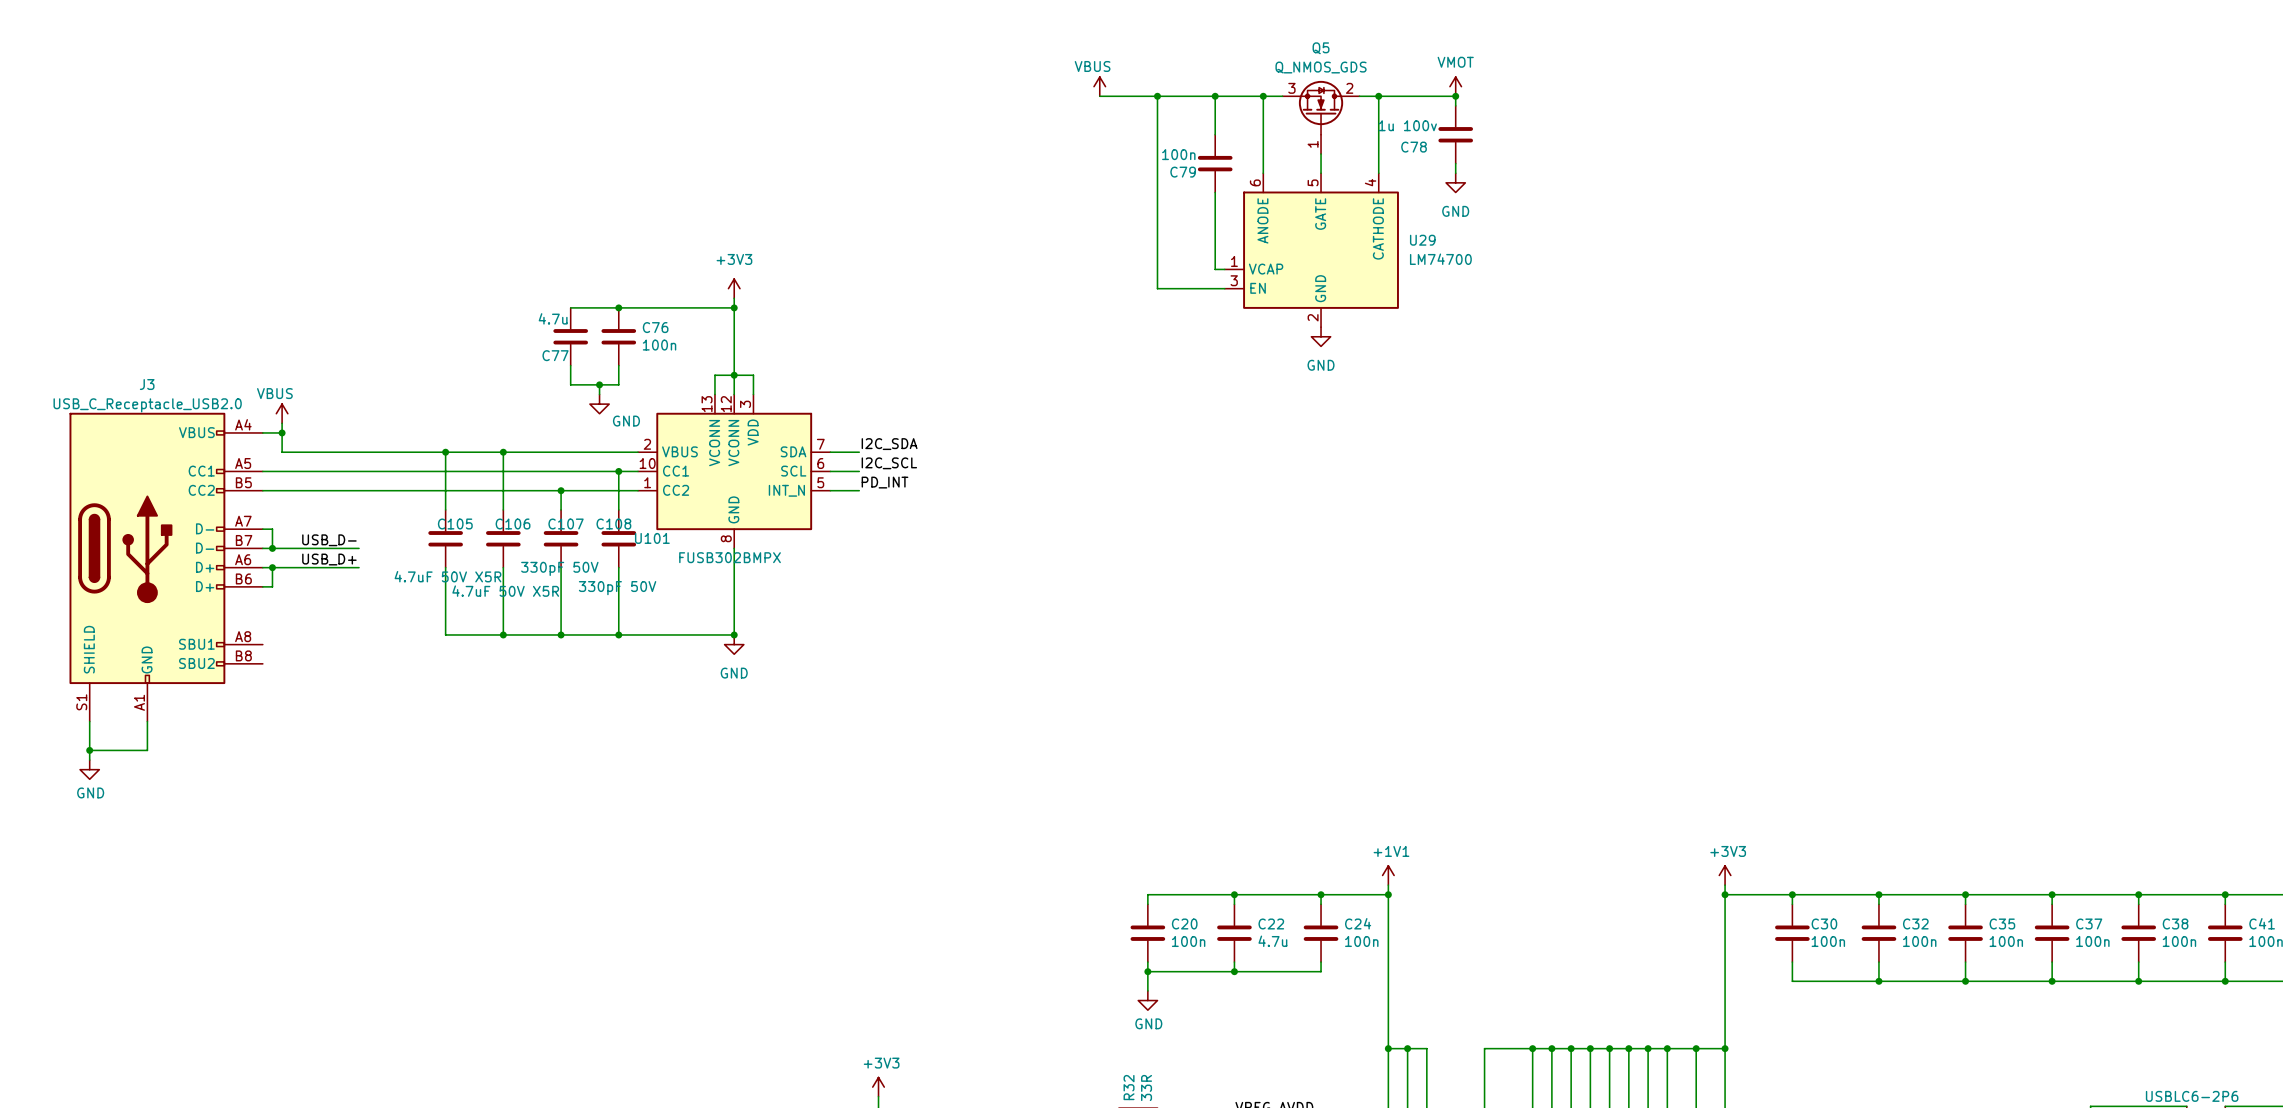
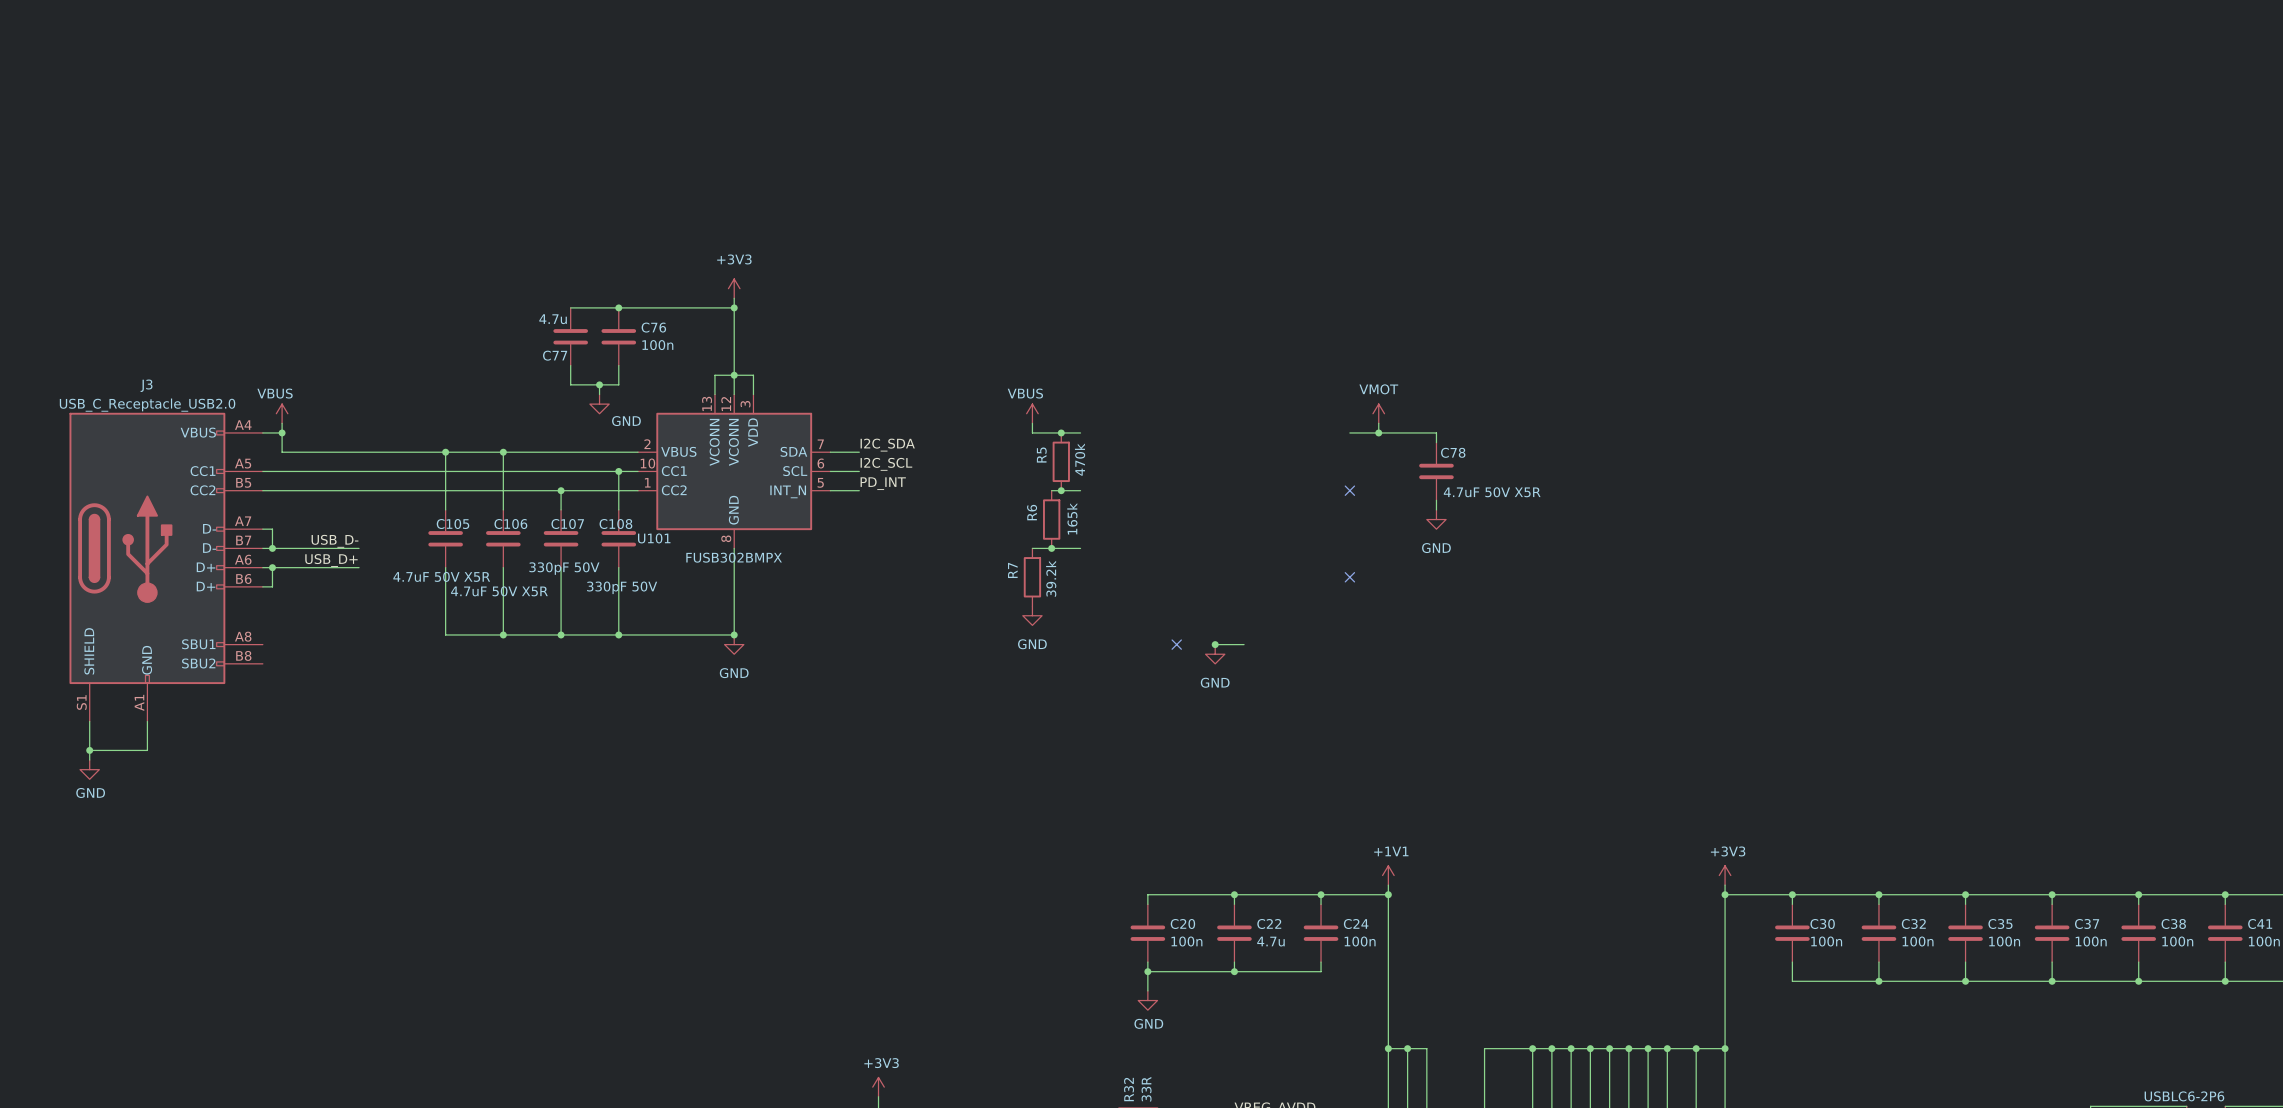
power symbol: VBUS (1099, 86) -> none
power symbol: VMOT (1455, 86) -> none
wire: (1099, 96) (1282, 96) -> none
wire: (1157, 96) (1157, 288) (1224, 288) -> none
junction: (1157, 96) -> none
wire: (1215, 96) (1215, 134) -> none
junction: (1215, 96) -> none
wire: (1263, 96) (1263, 173) -> none
junction: (1263, 96) -> none
wire: (1359, 96) (1455, 96) (1455, 105) -> none
wire: (1378, 96) (1378, 173) -> none
junction: (1378, 96) -> none
junction: (1455, 96) -> none
Q5: Q_NMOS_GDS (1321, 117) -> none
C78 value: 1u 100v (1407, 125) -> 4.7uF 50V X5R (1492, 492)
C78 position: (1455, 134) -> (1436, 471)
C78 name position: C78 (1414, 147) -> C78 (1453, 452)
wire: (1321, 154) (1321, 173) -> none
C79: 100n (1215, 163) -> none
wire: (1455, 163) (1455, 173) -> none
power symbol: GND (1455, 182) -> none
wire: (1215, 192) (1215, 269) (1224, 269) -> none
U29: LM74700 (1311, 250) -> none
power symbol: GND (1321, 336) -> none
power symbol: none -> VBUS (1032, 413)
power symbol: none -> VMOT (1378, 413)
wire: none -> (1032, 423) (1032, 432) (1080, 432)
wire: none -> (1378, 423) (1378, 432)
junction: none -> (1061, 432)
wire: none -> (1349, 432) (1436, 432) (1436, 442)
junction: none -> (1378, 432)
R5: none -> 470k (1061, 461)
wire: none -> (1051, 490) (1080, 490)
junction: none -> (1061, 490)
no-connect mark: none -> (1349, 490)
wire: none -> (1436, 500) (1436, 509)
R6: none -> 165k (1051, 519)
power symbol: none -> GND (1436, 519)
wire: none -> (1032, 548) (1080, 548)
junction: none -> (1051, 548)
R7: none -> 39.2k (1032, 577)
no-connect mark: none -> (1349, 577)
power symbol: none -> GND (1032, 615)
no-connect mark: none -> (1176, 644)
wire: none -> (1215, 644) (1244, 644)
junction: none -> (1215, 644)
power symbol: none -> GND (1215, 654)

